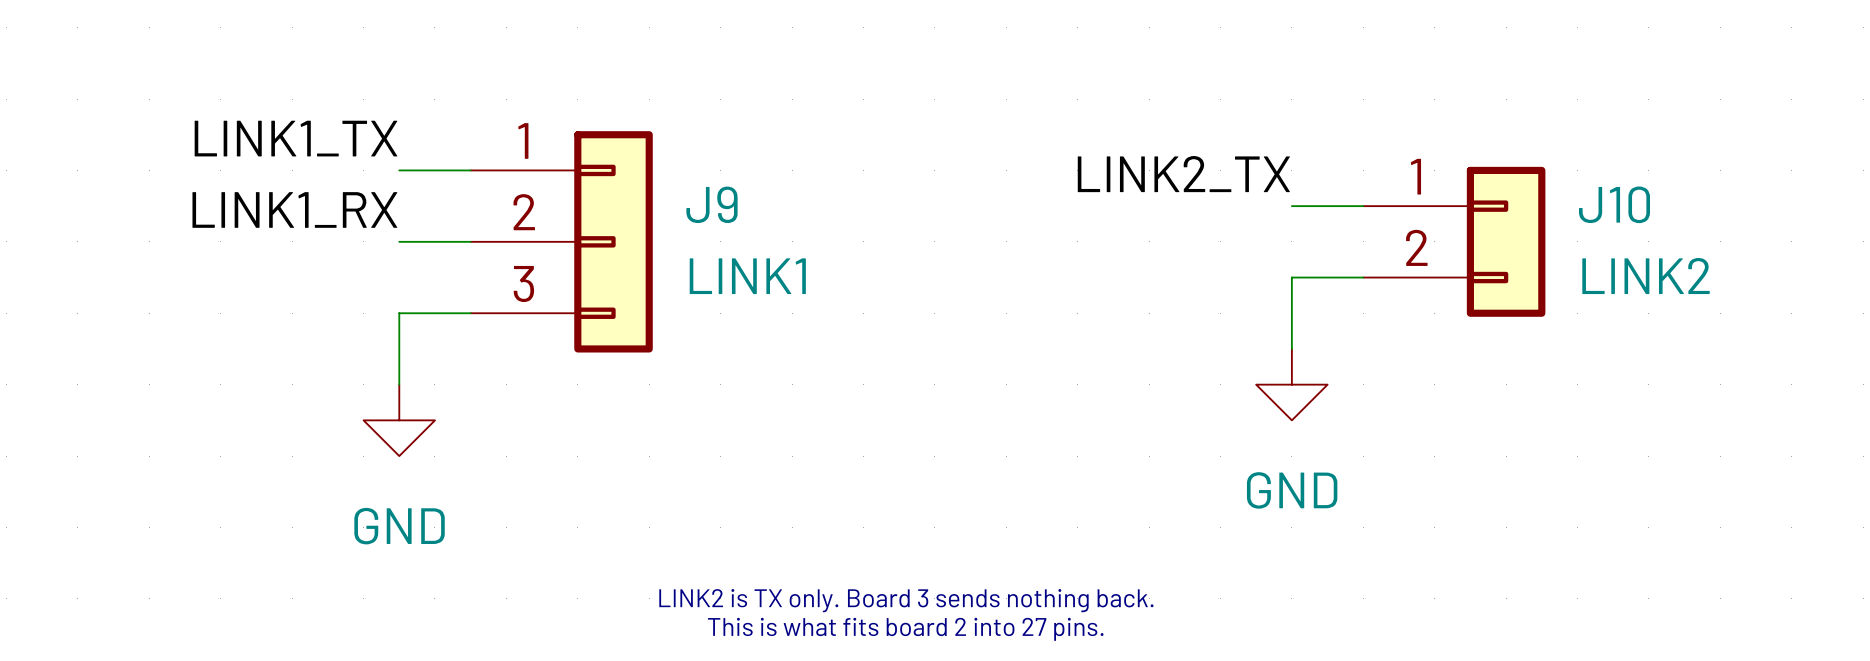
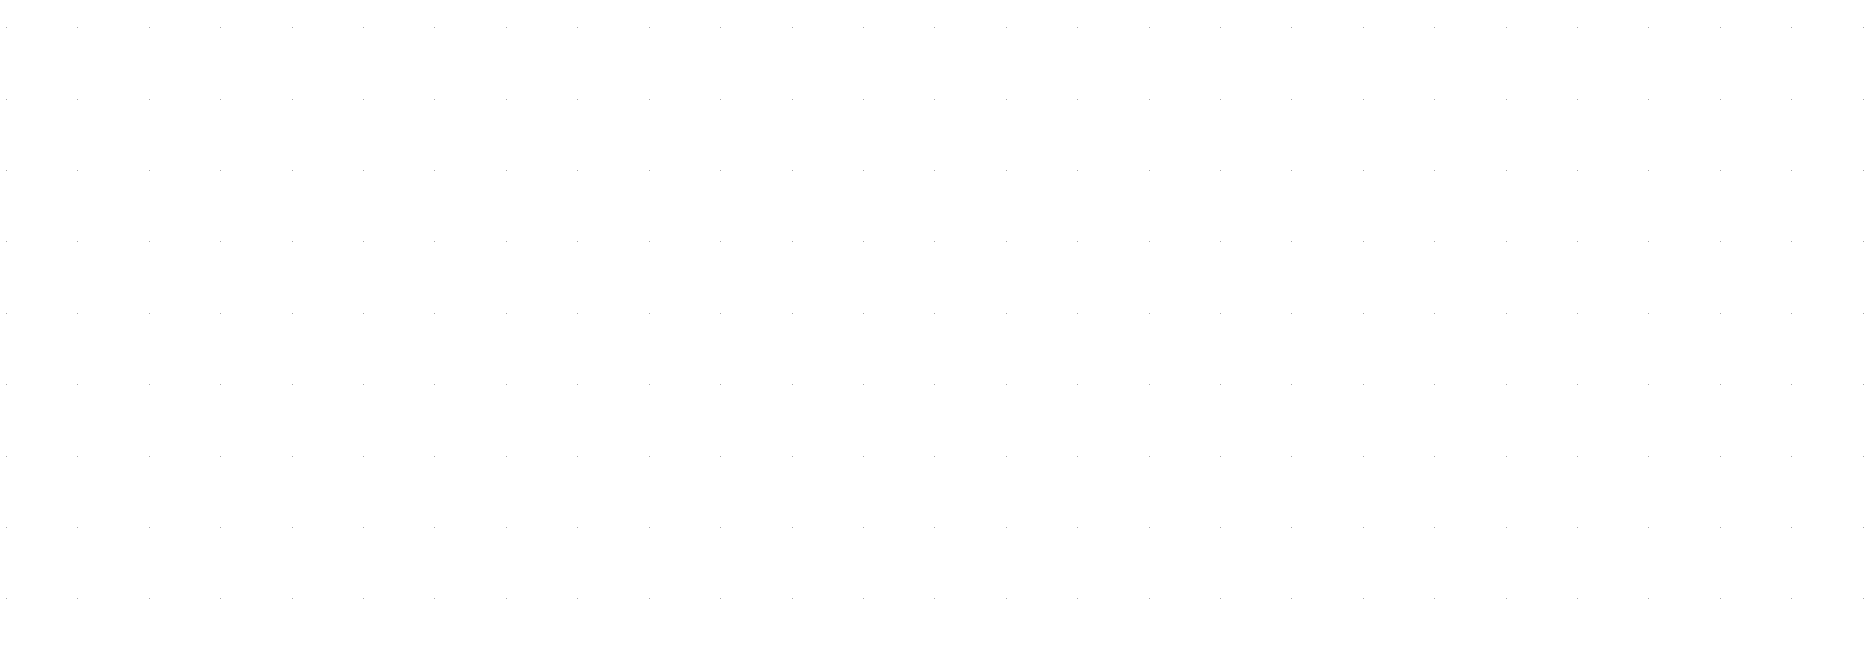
label: LINK1_TX (296, 138) -> none
wire: (399, 170) (470, 170) -> none
label: LINK2_TX (1183, 174) -> none
wire: (1291, 206) (1363, 206) -> none
label: LINK1_RX (294, 209) -> none
wire: (399, 241) (470, 241) -> none
J9: LINK1 (561, 241) -> none
J10: LINK2 (1454, 241) -> none
wire: (1363, 277) (1291, 277) (1291, 348) -> none
wire: (470, 313) (399, 313) (399, 384) -> none
power symbol: GND (1291, 384) -> none
power symbol: GND (399, 420) -> none
text: LINK2 is TX only. Board 3 sends nothing back. (906, 600) -> none
text: This is what fits board 2 into 27 pins. (905, 629) -> none

